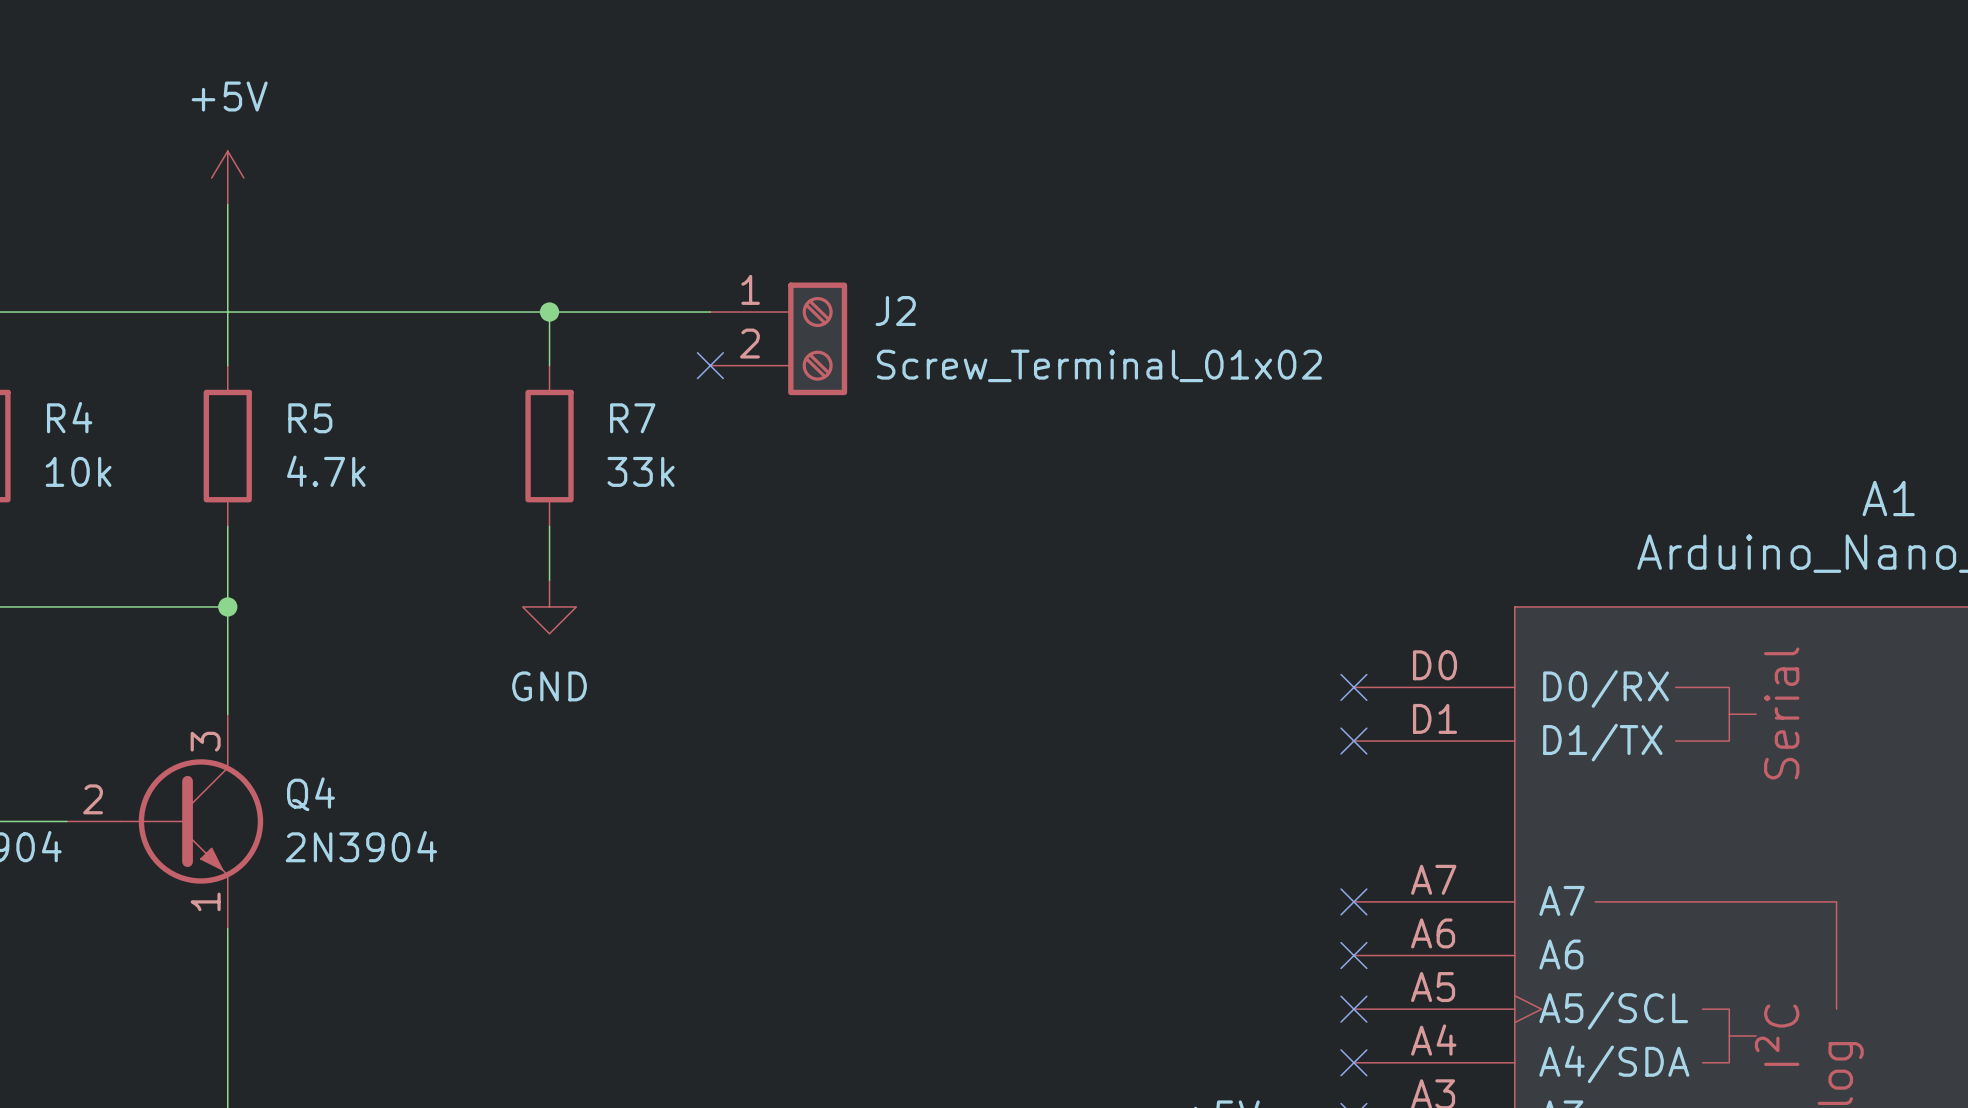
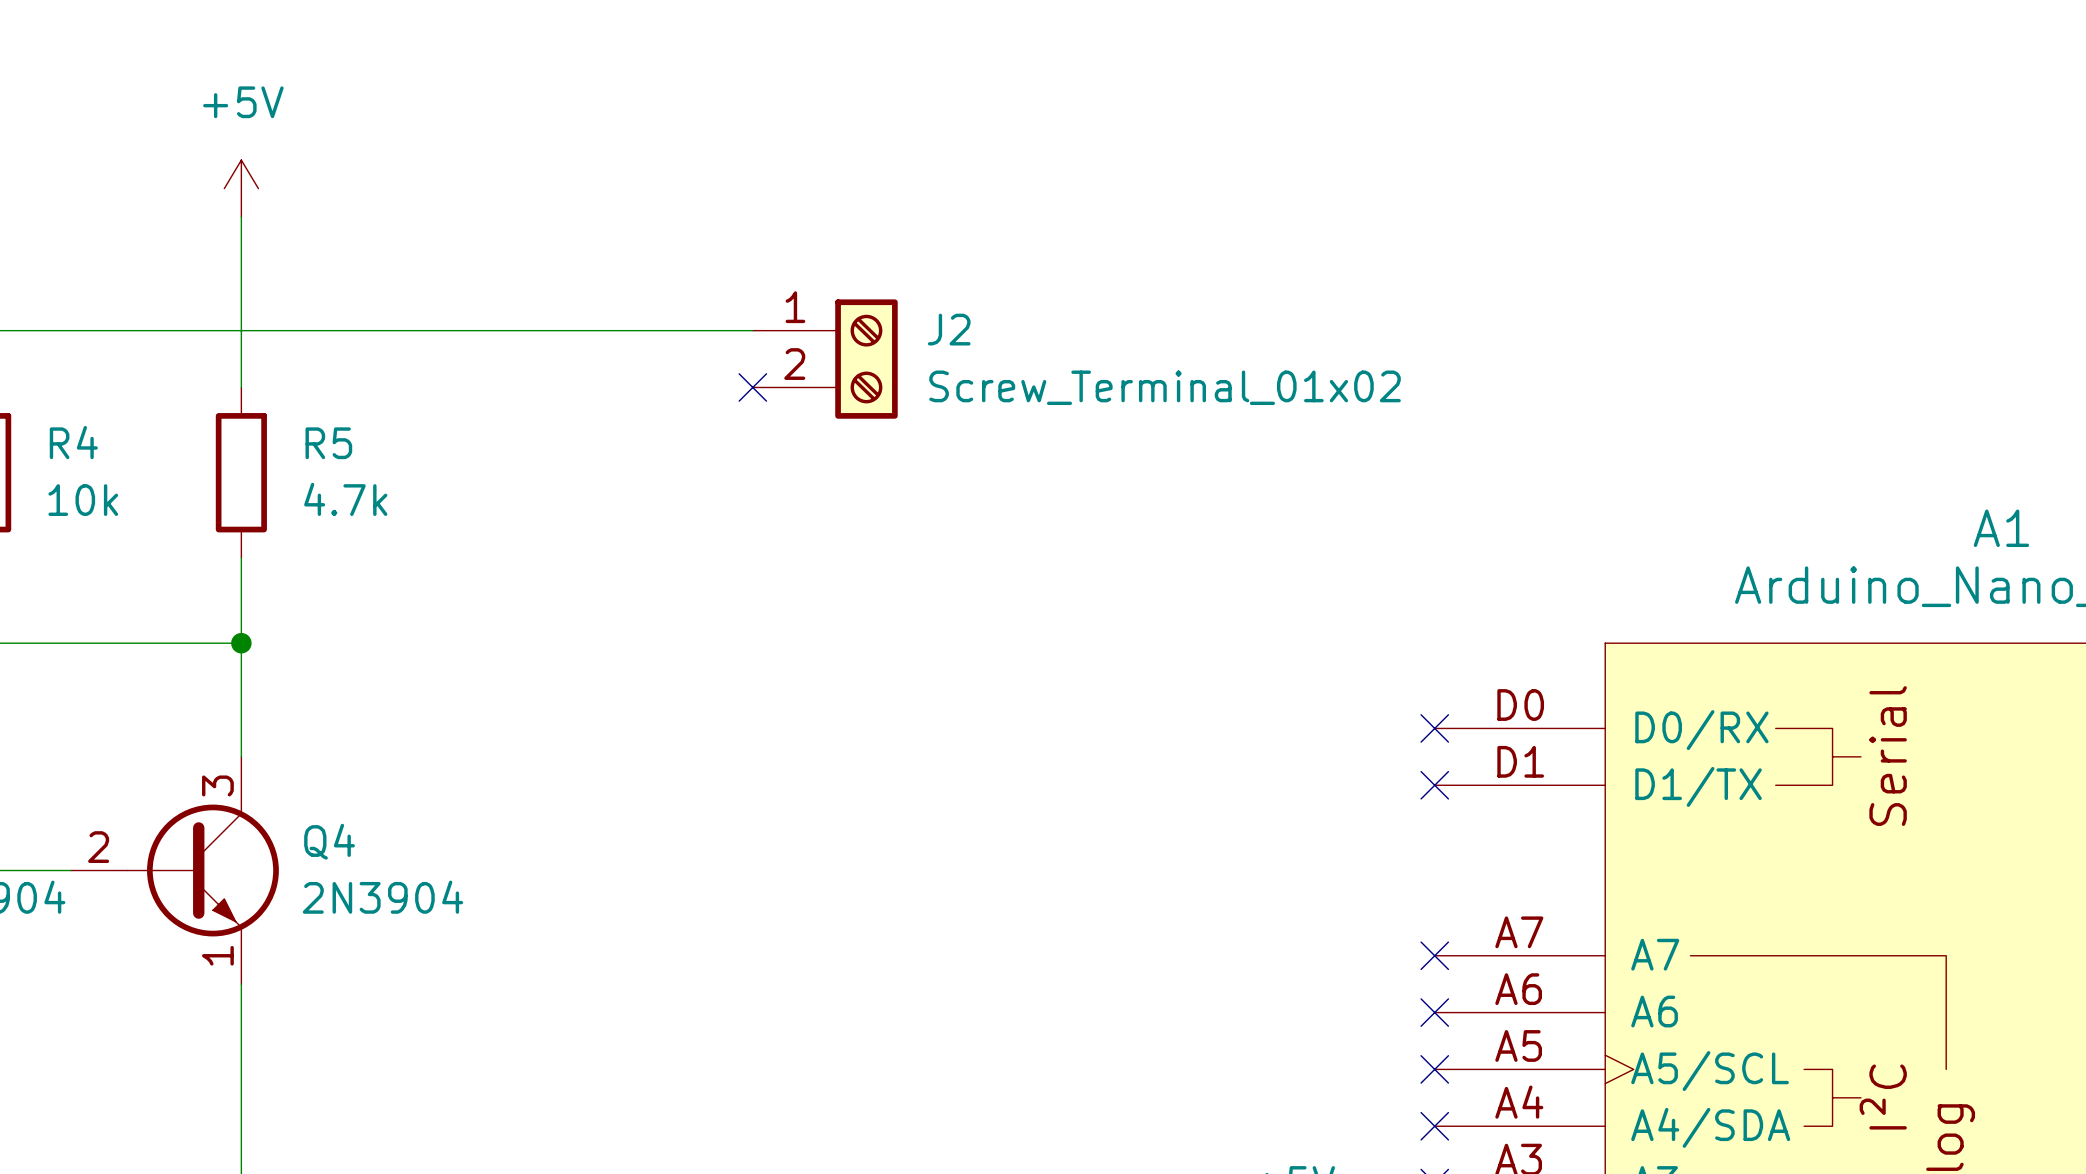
wire: (549, 312) (549, 365) -> none
junction: (549, 312) -> none
R7: 33k (549, 446) -> none
wire: (549, 526) (549, 580) -> none
power symbol: GND (549, 606) -> none

